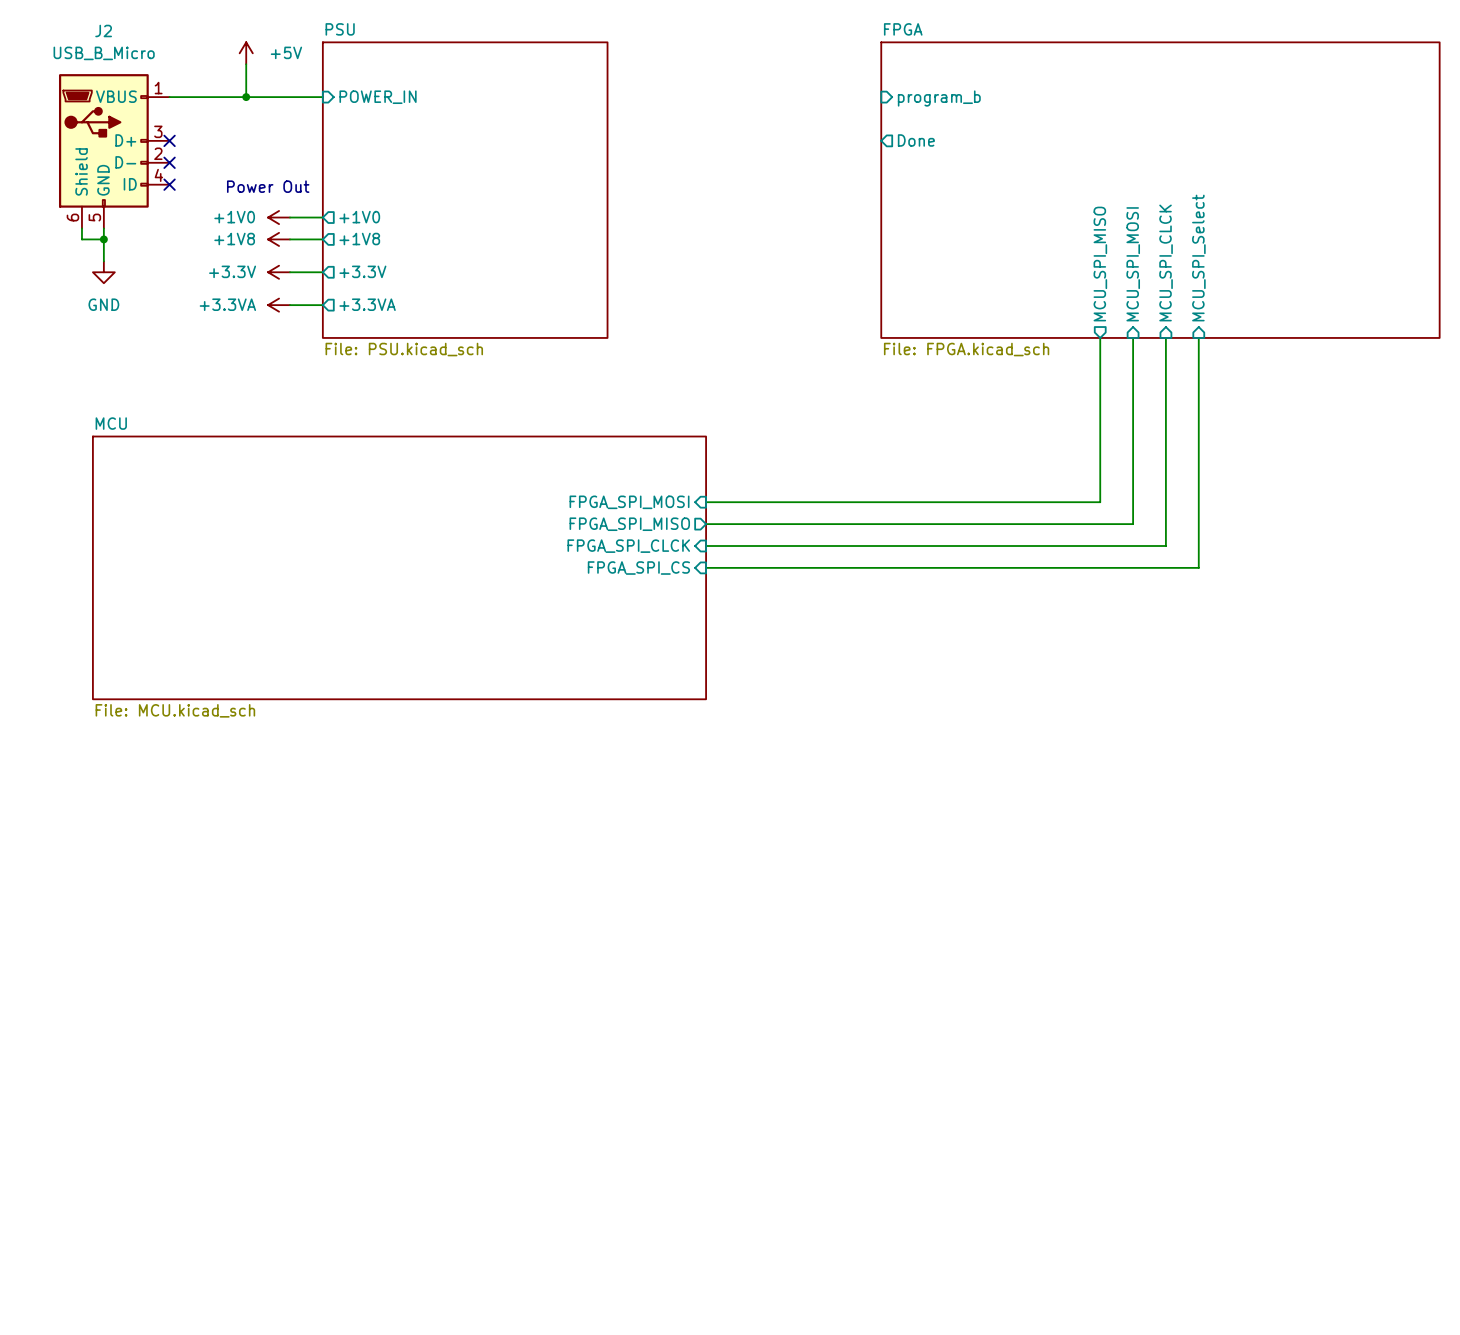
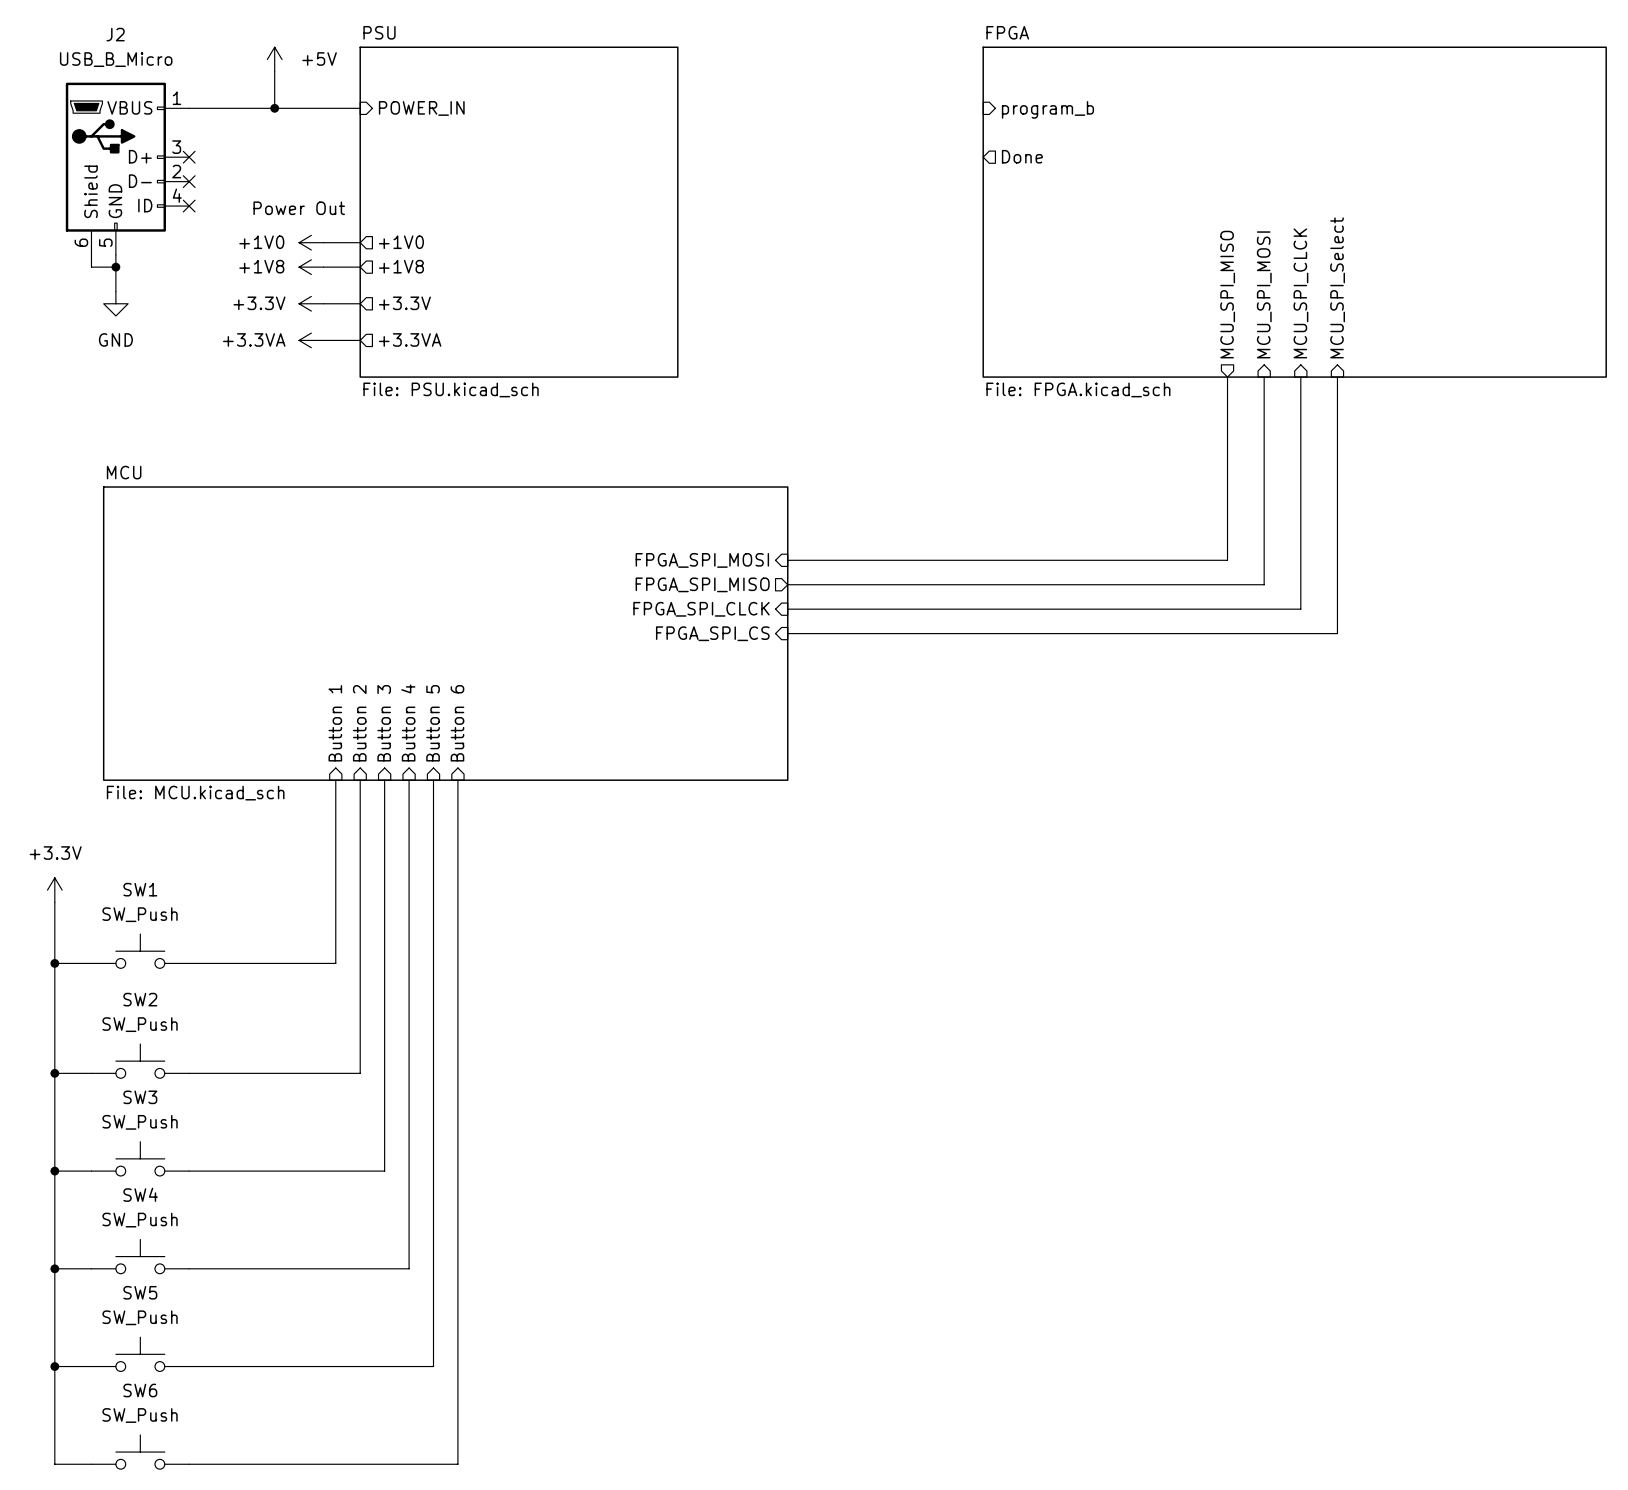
sheet pin: none -> Button 1 (335, 723)
sheet pin: none -> Button 2 (359, 723)
sheet pin: none -> Button 3 (384, 723)
sheet pin: none -> Button 4 (408, 722)
sheet pin: none -> Button 5 (433, 723)
sheet pin: none -> Button 6 (457, 723)
wire: none -> (335, 780) (335, 963) (189, 963)
wire: none -> (360, 780) (360, 1073) (189, 1073)
wire: none -> (384, 780) (384, 1171) (189, 1171)
wire: none -> (409, 780) (409, 1268) (189, 1268)
wire: none -> (433, 780) (433, 1366) (189, 1366)
wire: none -> (457, 780) (457, 1464) (189, 1464)
power symbol: none -> +3.3V (54, 890)
wire: none -> (54, 902) (54, 1464) (91, 1464)
SW1: none -> SW_Push (140, 951)
wire: none -> (54, 963) (91, 963)
junction: none -> (54, 963)
SW2: none -> SW_Push (140, 1061)
wire: none -> (54, 1073) (91, 1073)
junction: none -> (54, 1073)
SW3: none -> SW_Push (140, 1158)
wire: none -> (54, 1171) (91, 1171)
junction: none -> (54, 1171)
SW4: none -> SW_Push (140, 1256)
wire: none -> (54, 1268) (91, 1268)
junction: none -> (54, 1268)
SW5: none -> SW_Push (140, 1354)
wire: none -> (54, 1366) (91, 1366)
junction: none -> (54, 1366)
SW6: none -> SW_Push (140, 1452)

